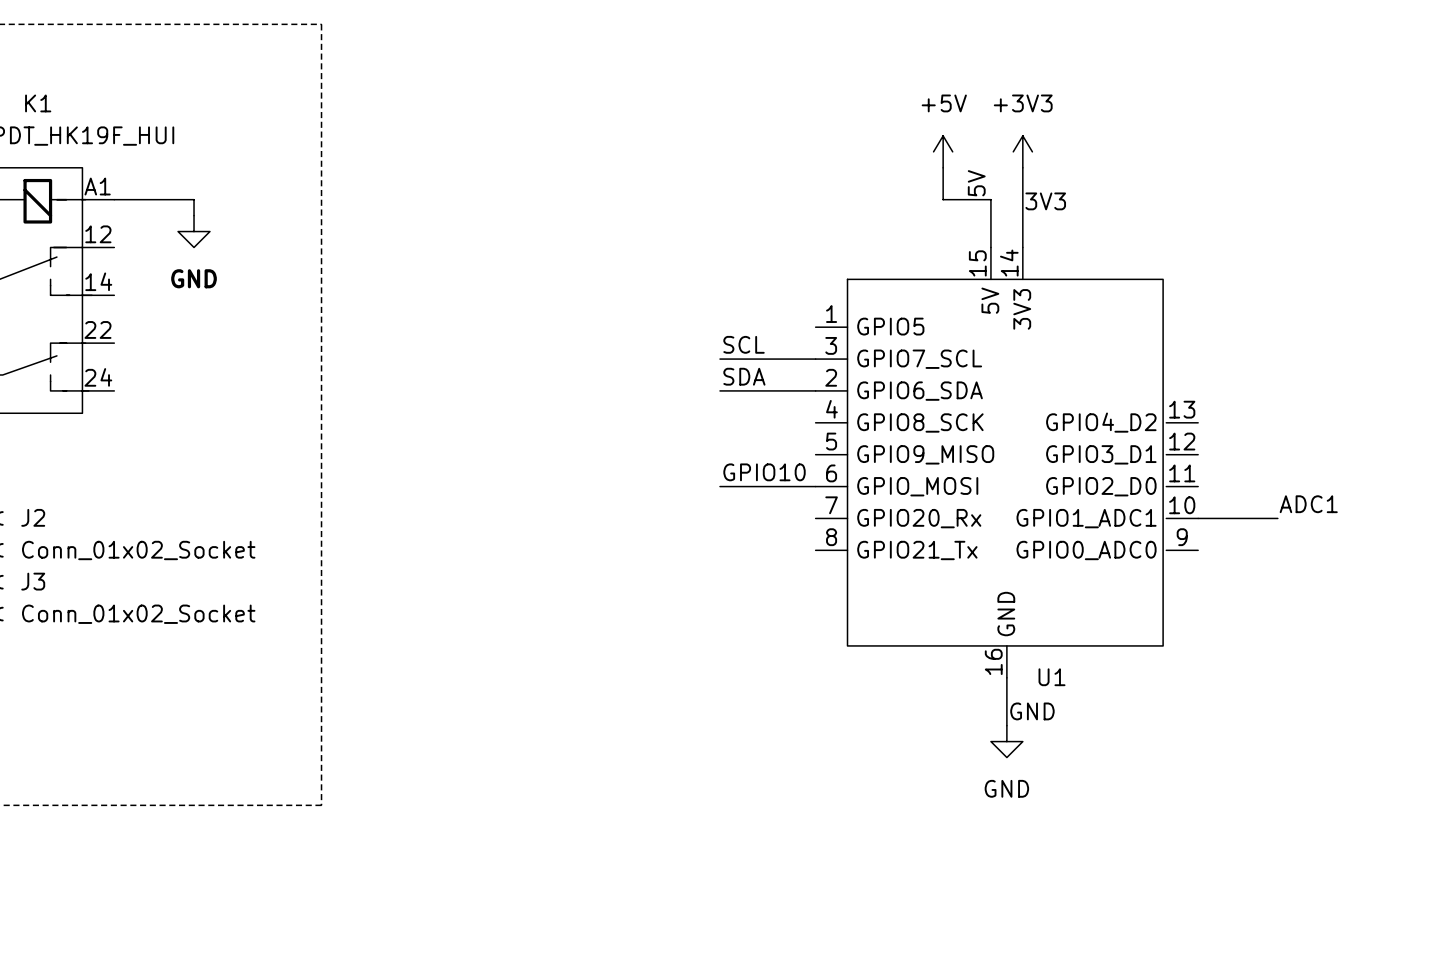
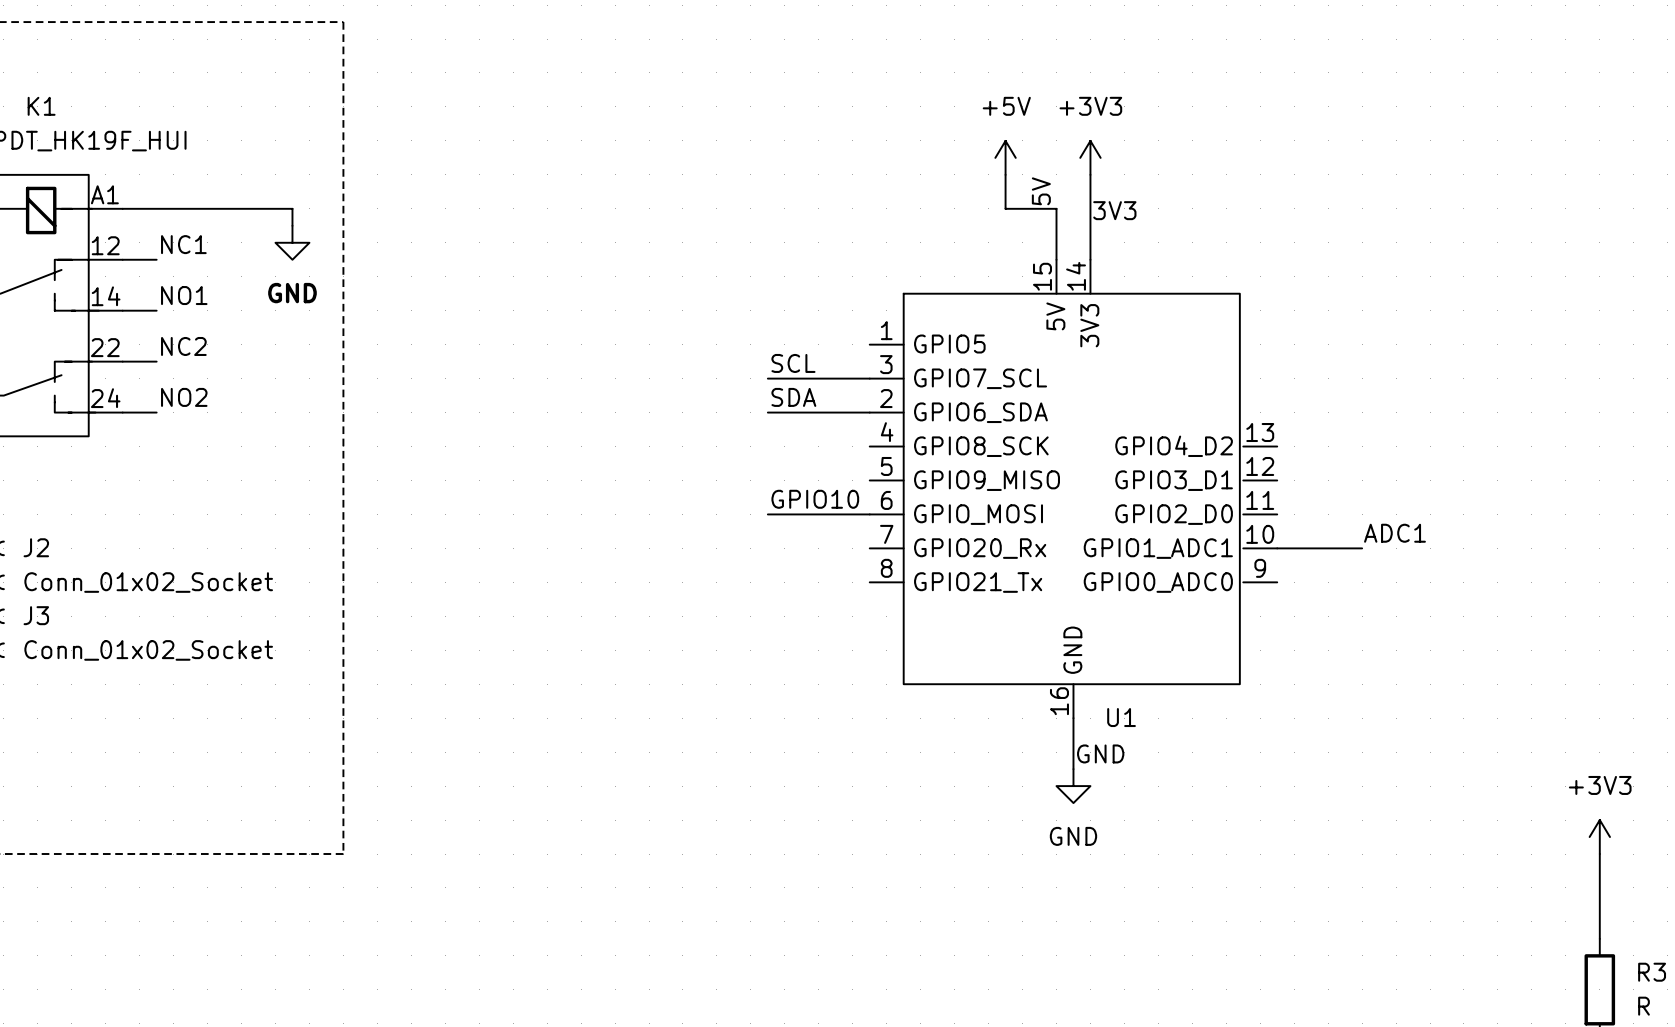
wire: (194, 199) (194, 215) -> (207, 208) (292, 208) (292, 225)
power symbol position: GND (194, 231) -> GND (292, 242)
label: none -> NC1 (183, 244)
wire: none -> (122, 259) (156, 259)
label: none -> NO1 (184, 295)
wire: none -> (122, 310) (156, 310)
label: none -> NC2 (183, 346)
wire: none -> (122, 361) (156, 361)
label: none -> NO2 (184, 397)
wire: none -> (122, 412) (156, 412)

